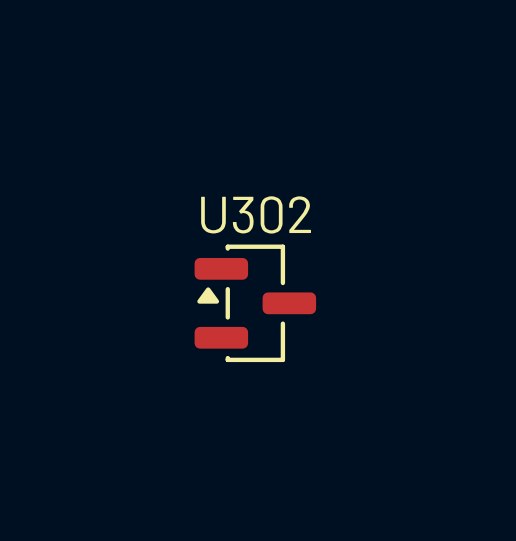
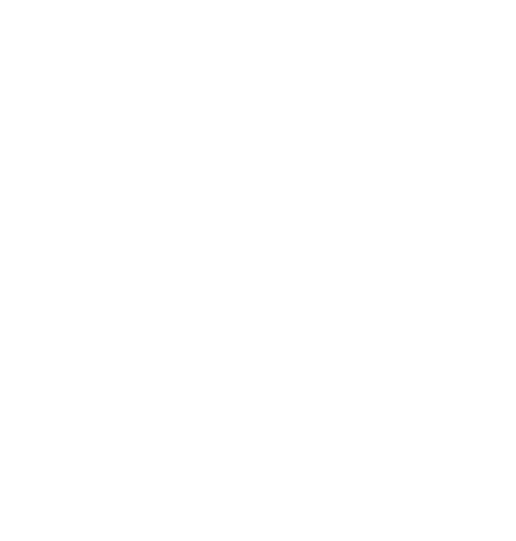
U302: (255, 303) -> none

